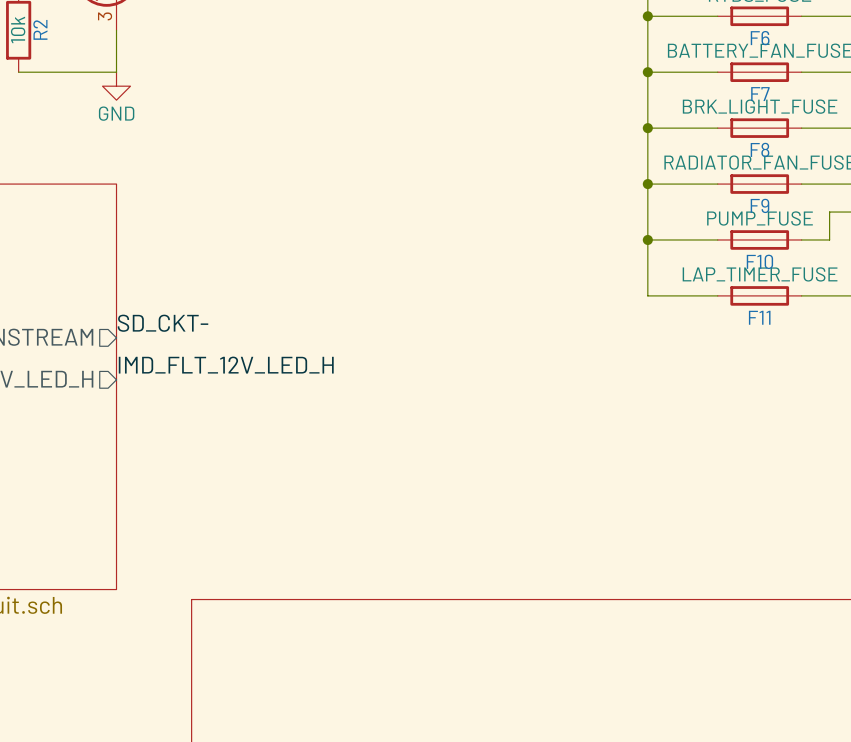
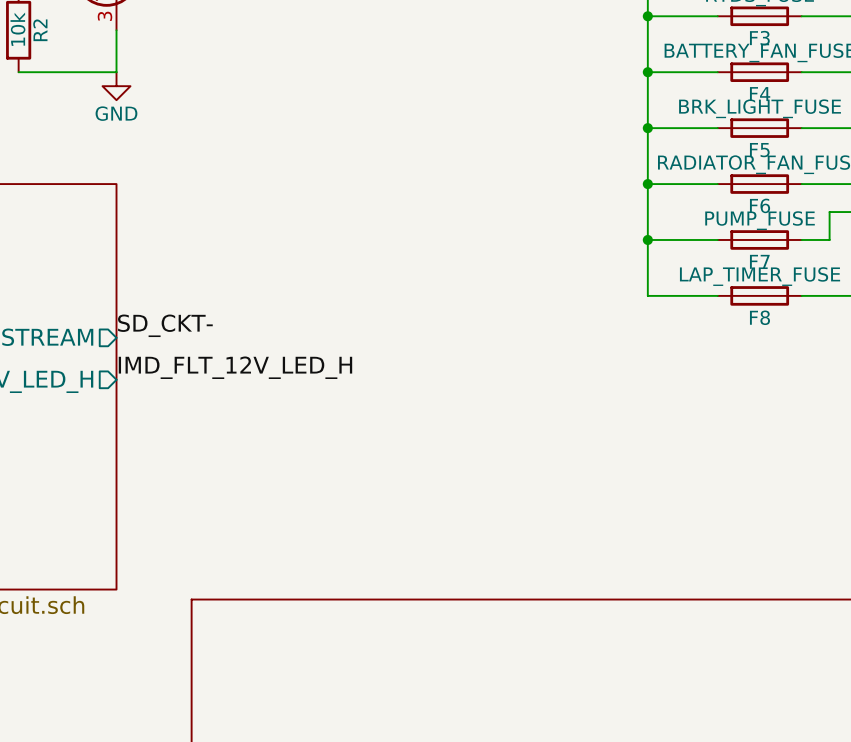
F6 name: F6 (760, 38) -> F3 (759, 38)
F7 name: F7 (760, 94) -> F4 (760, 94)
F8 name: F8 (760, 149) -> F5 (759, 150)
F9 name: F9 (759, 205) -> F6 (760, 205)
F10 name: F10 (759, 261) -> F7 (759, 261)
F11 name: F11 (759, 317) -> F8 (759, 317)

